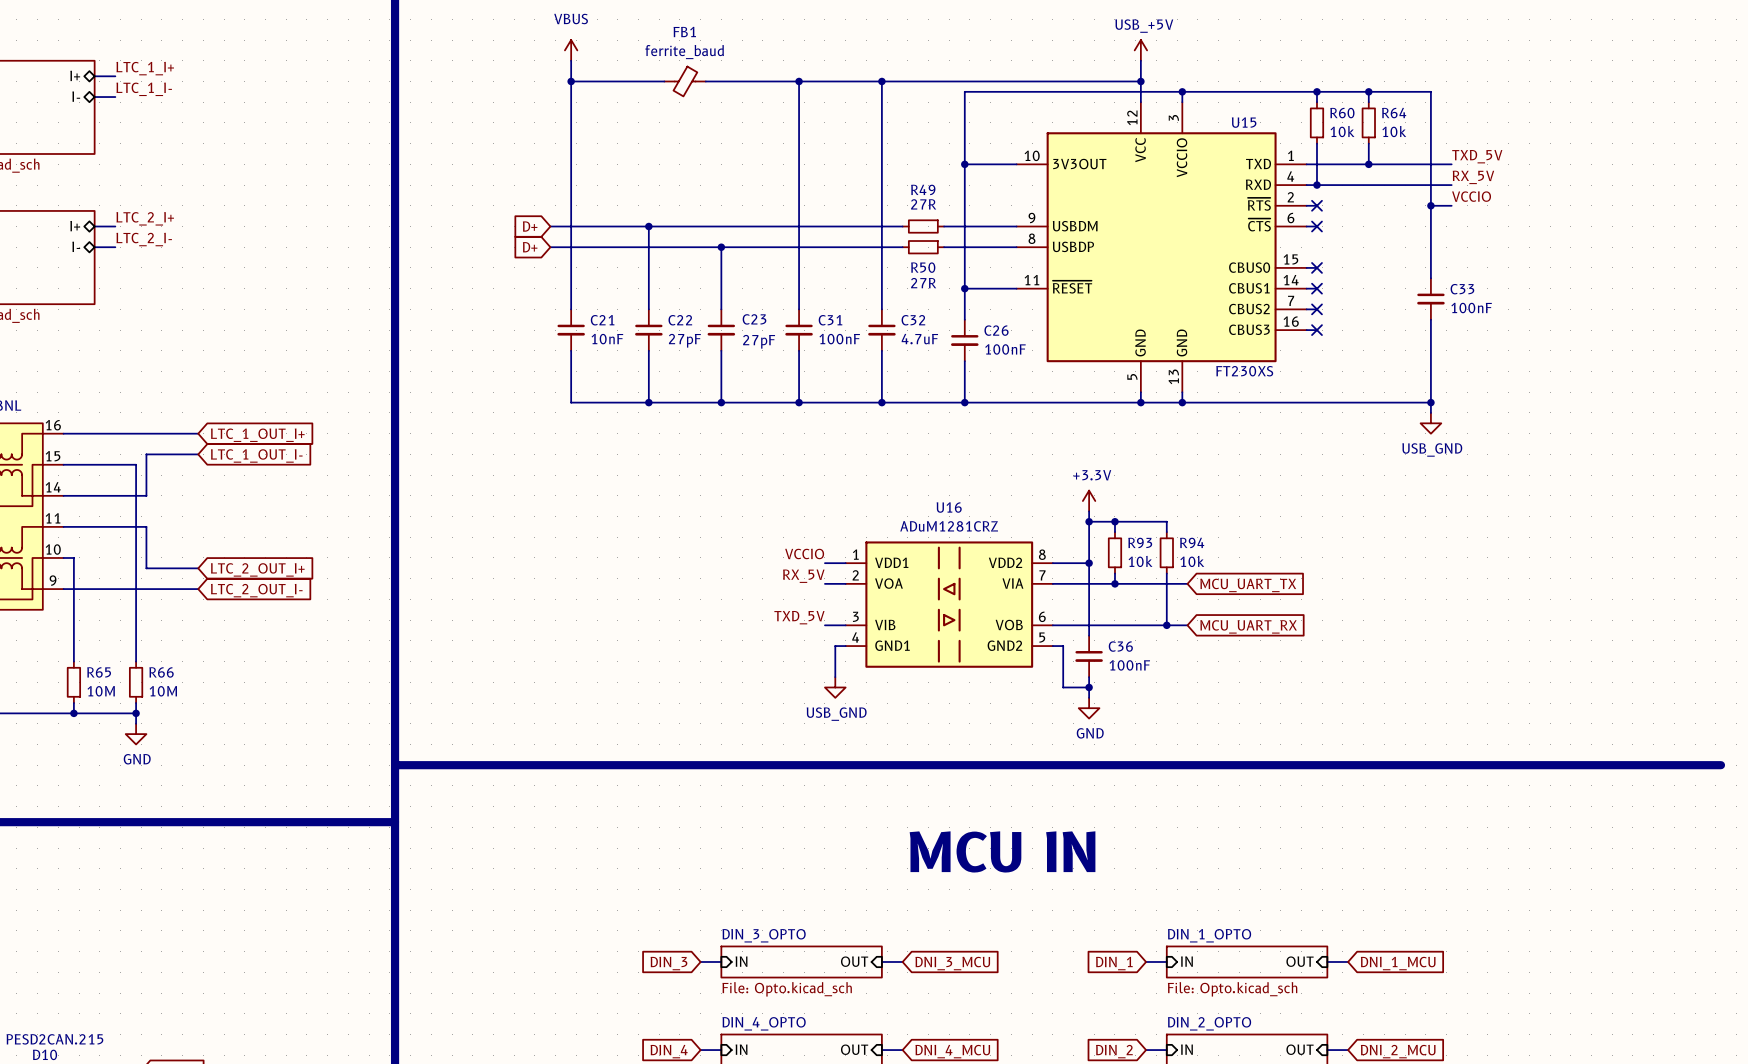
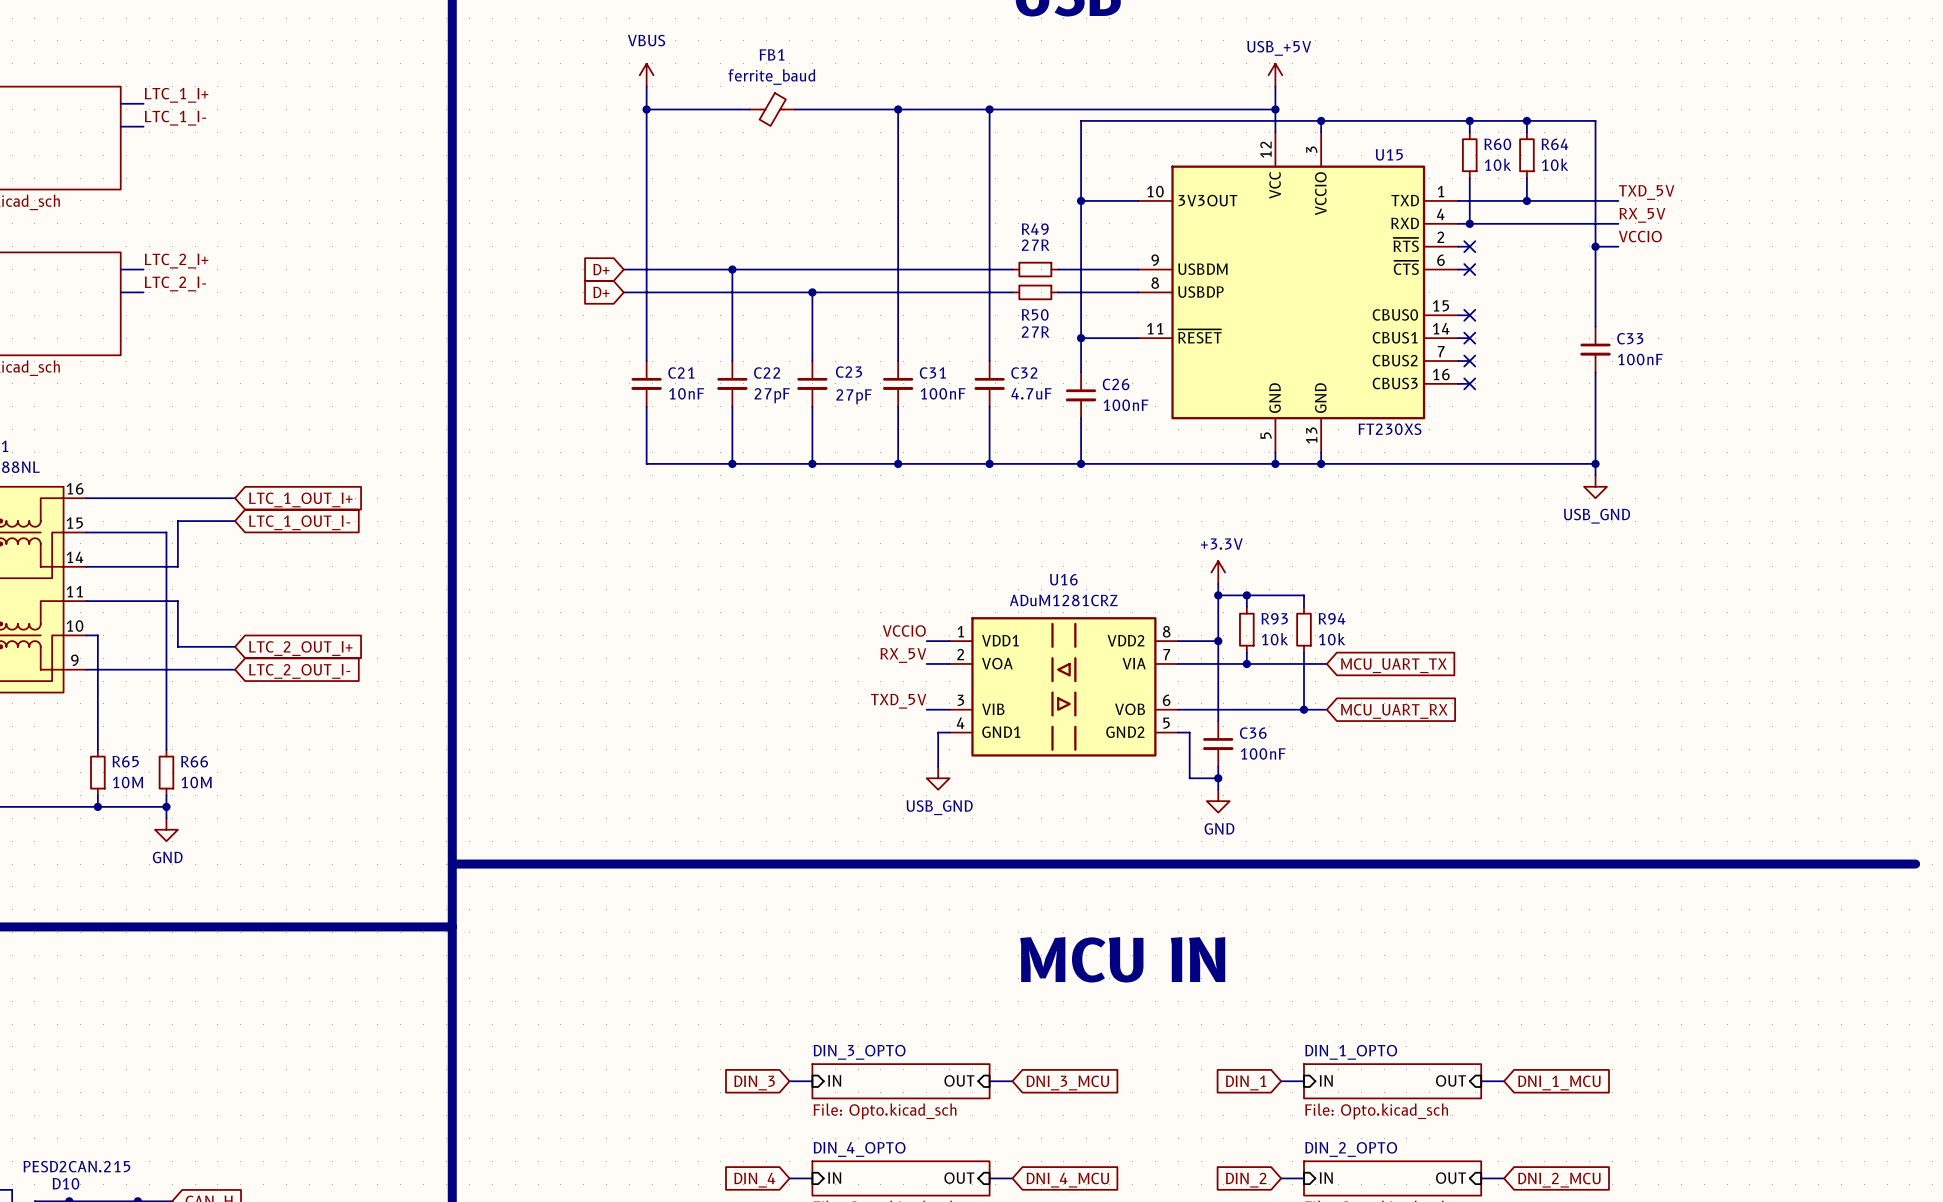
sheet pin: I+ (75, 75) -> none
sheet pin: I- (76, 96) -> none
sheet pin: I+ (75, 226) -> none
sheet pin: I- (76, 246) -> none

